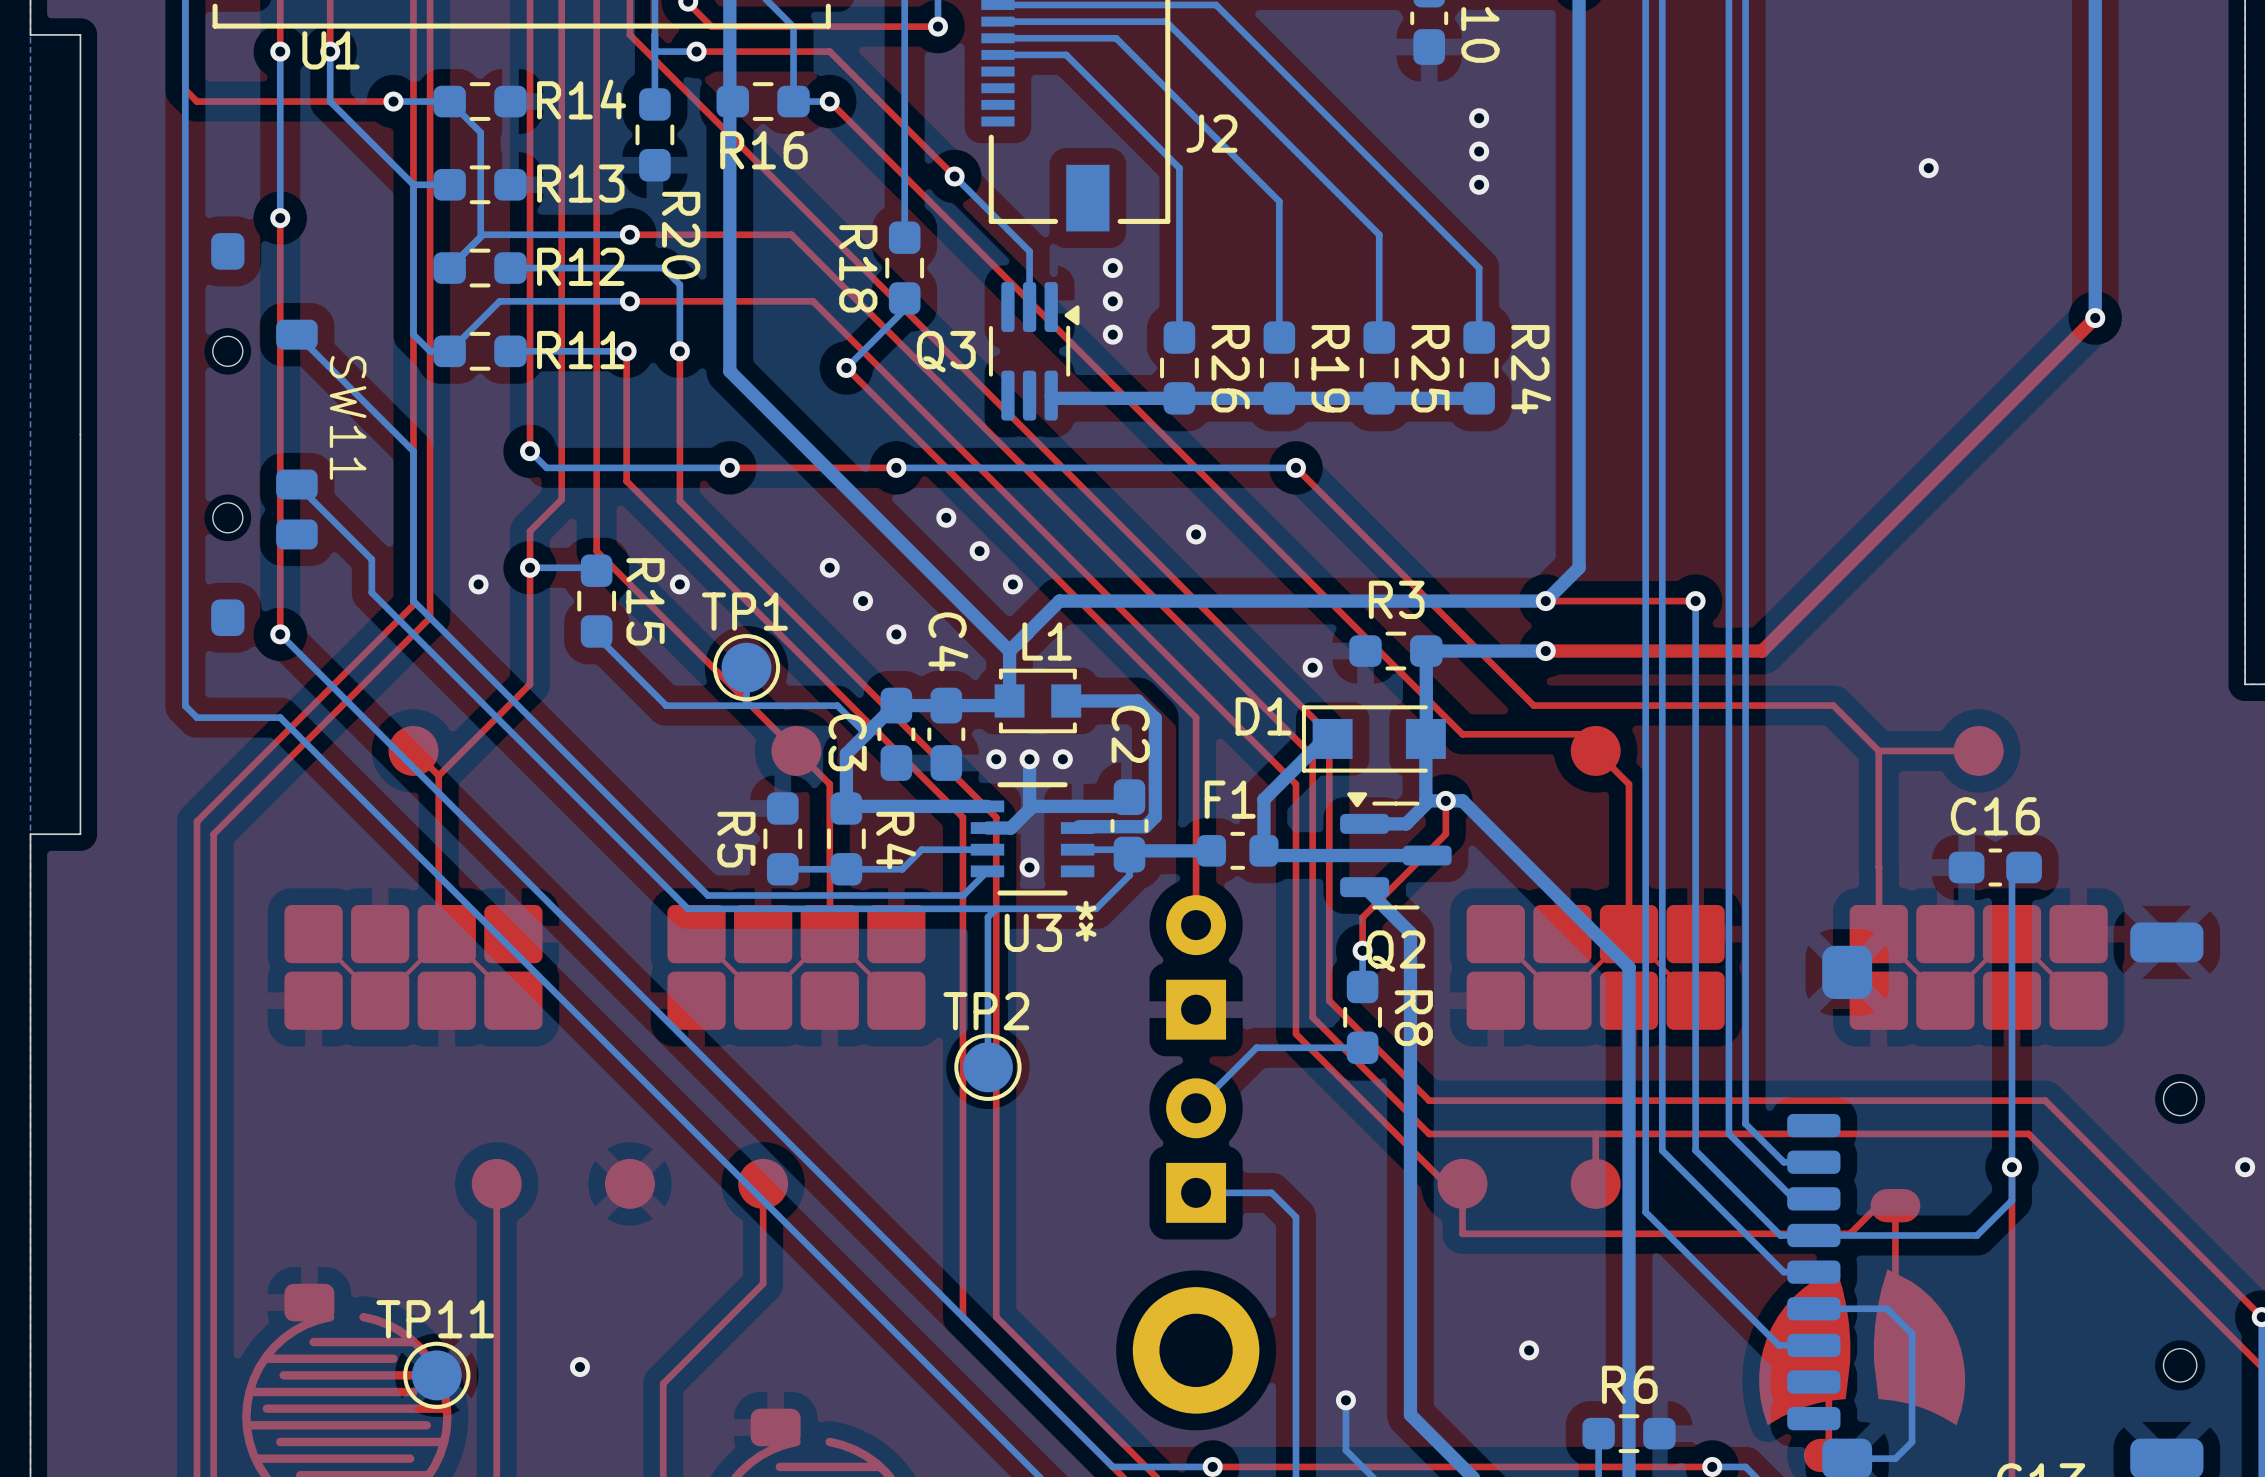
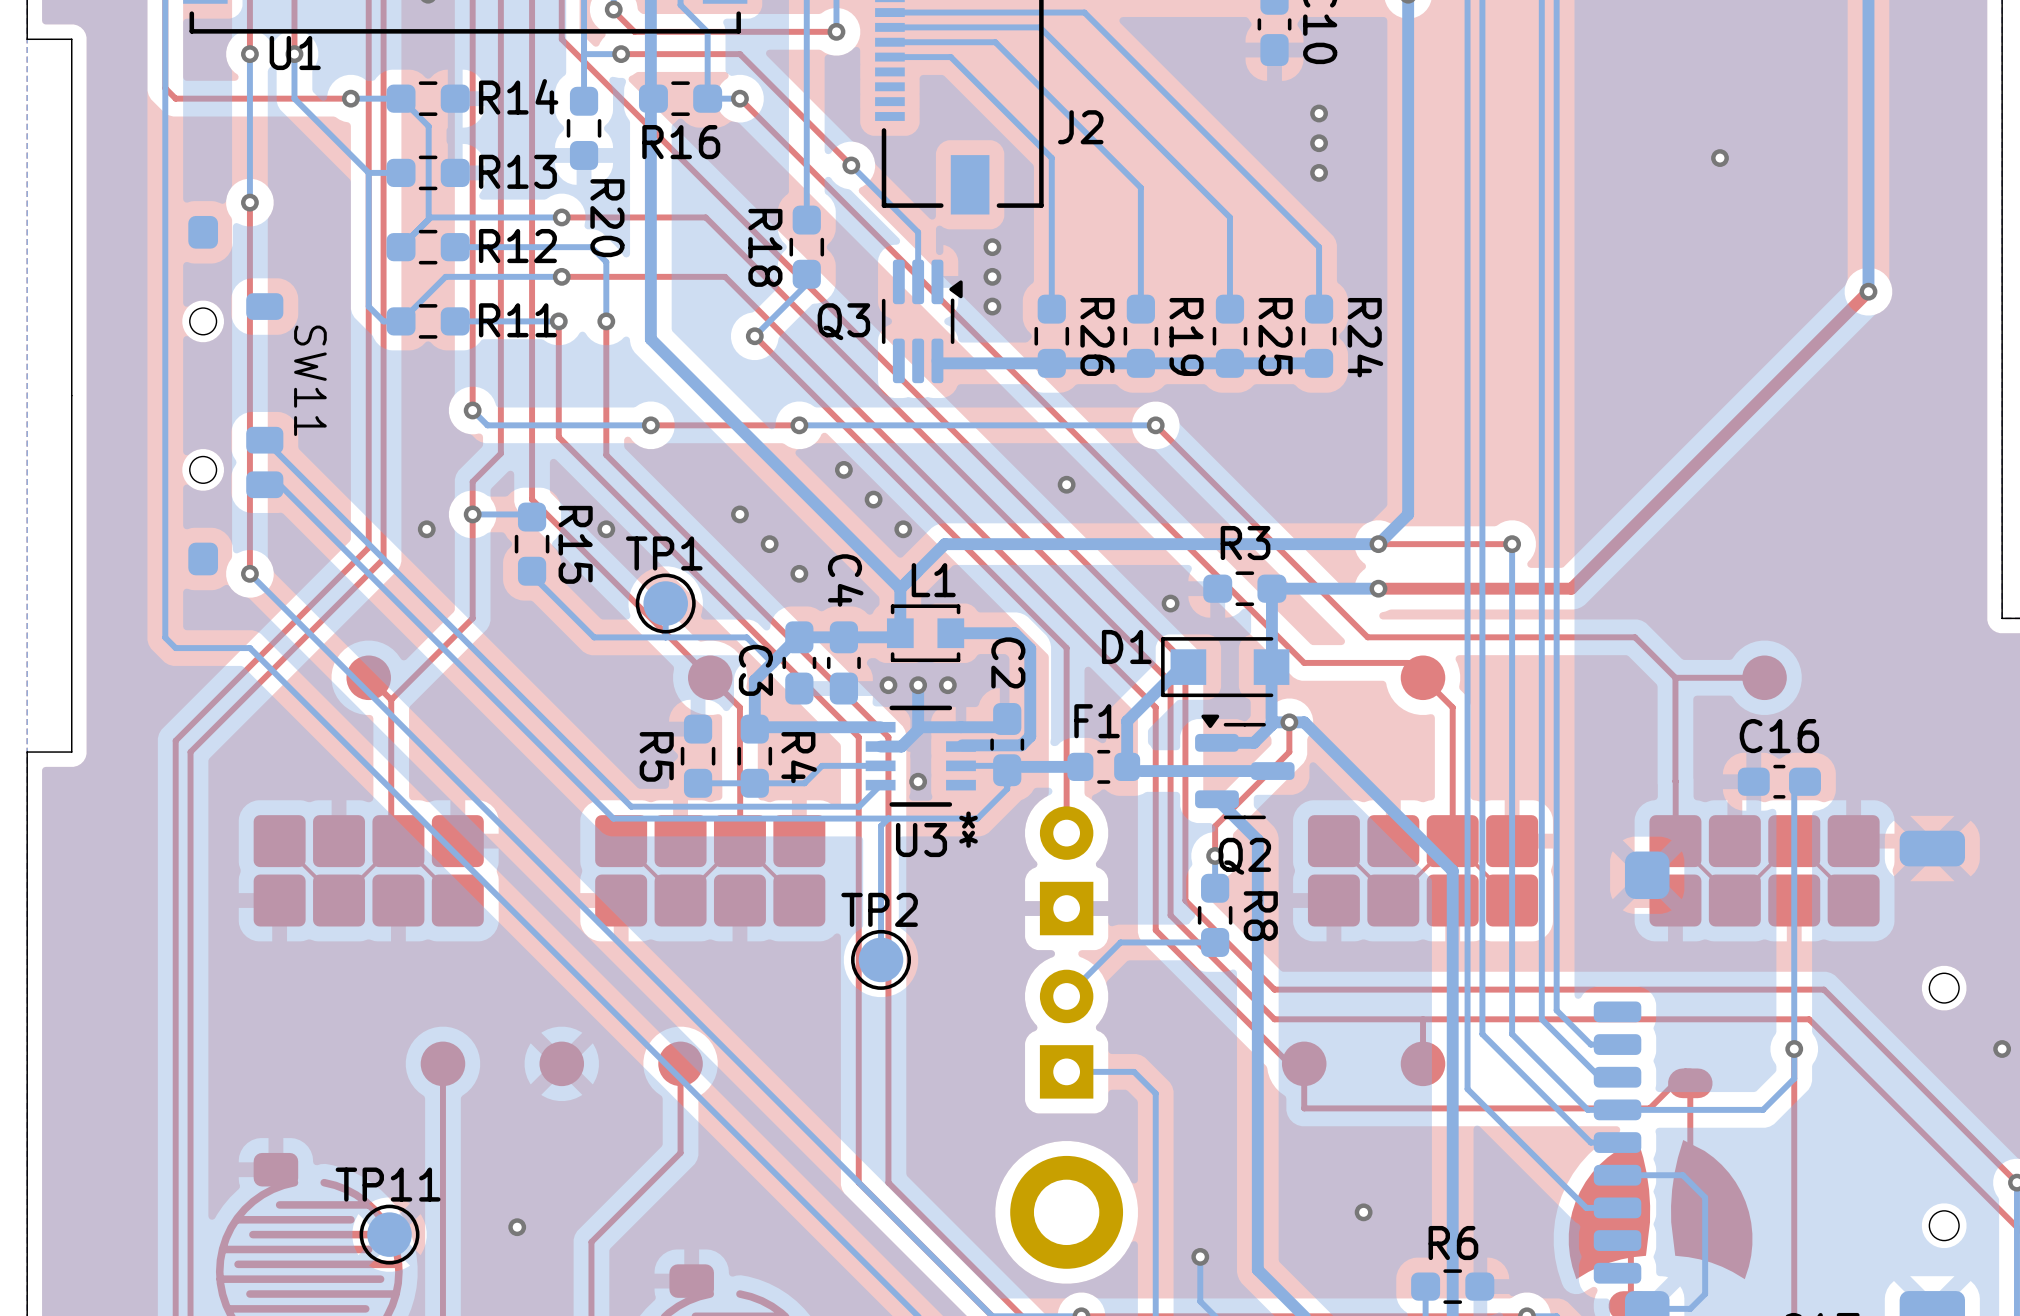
bottom track: (296, 334) (413, 451) (413, 601) -> none
bottom track: none -> (264, 484) (279, 484) (331, 536)
bottom track: (371, 559) (371, 592) -> (331, 507) (368, 544)

